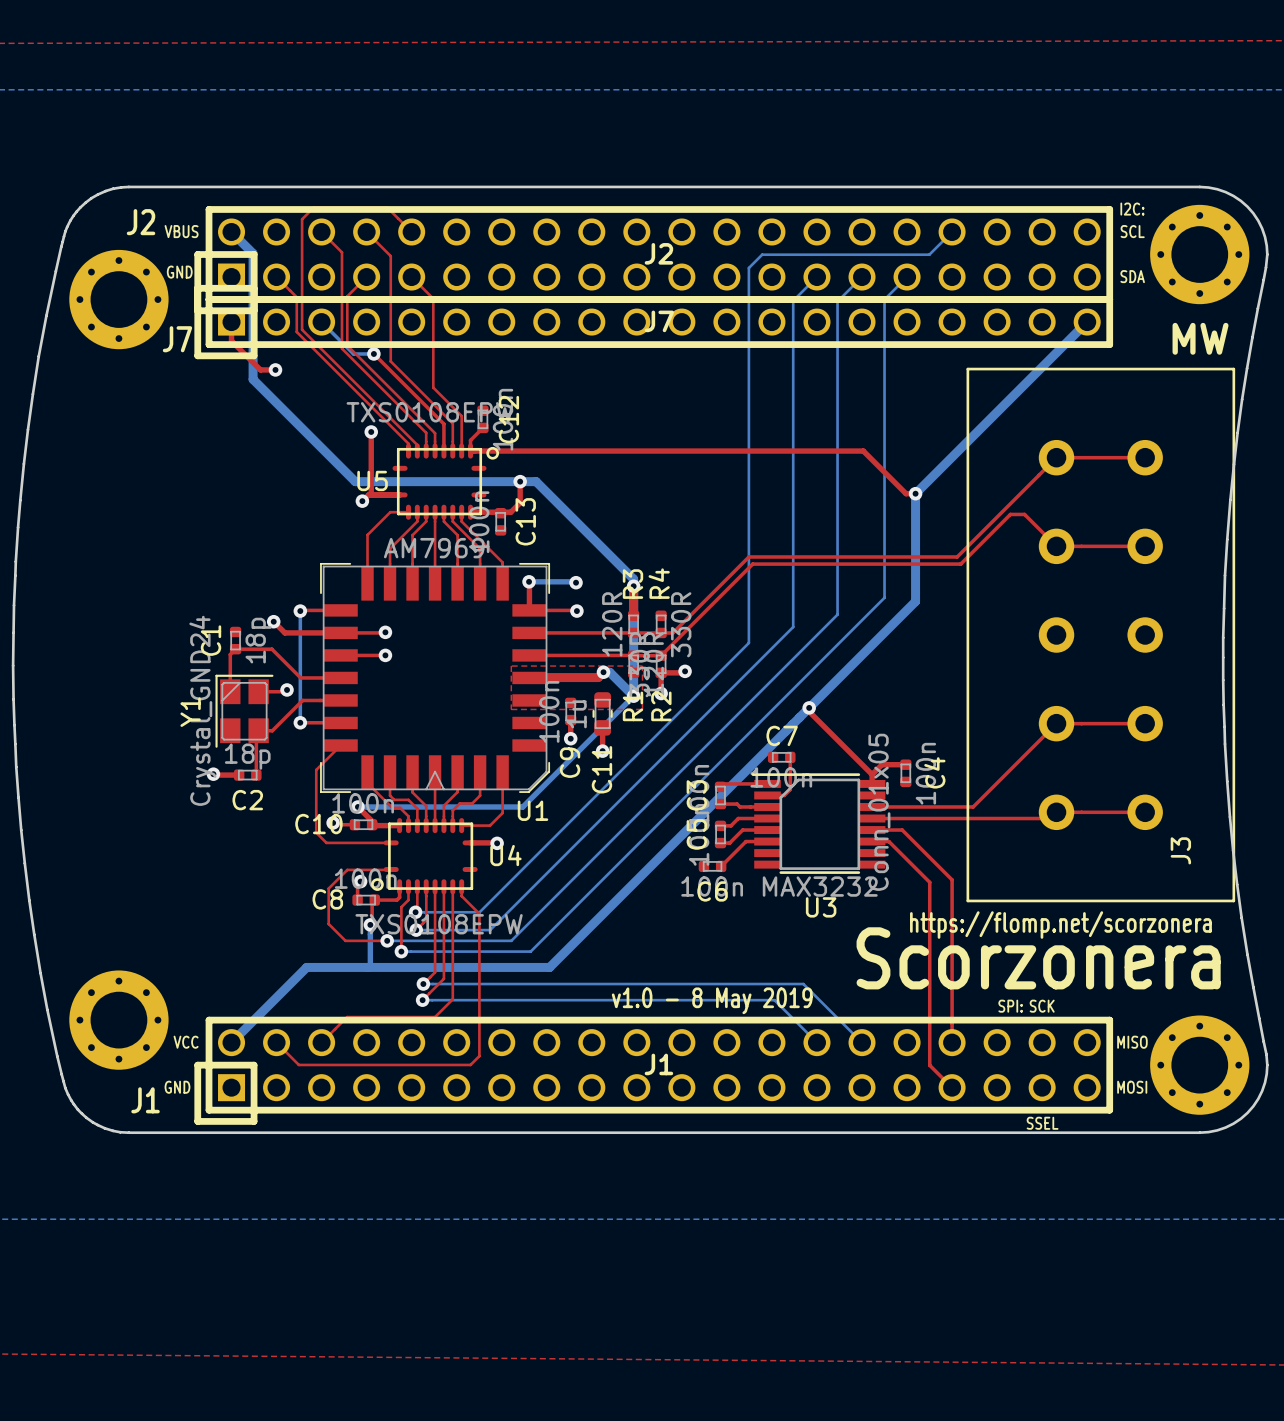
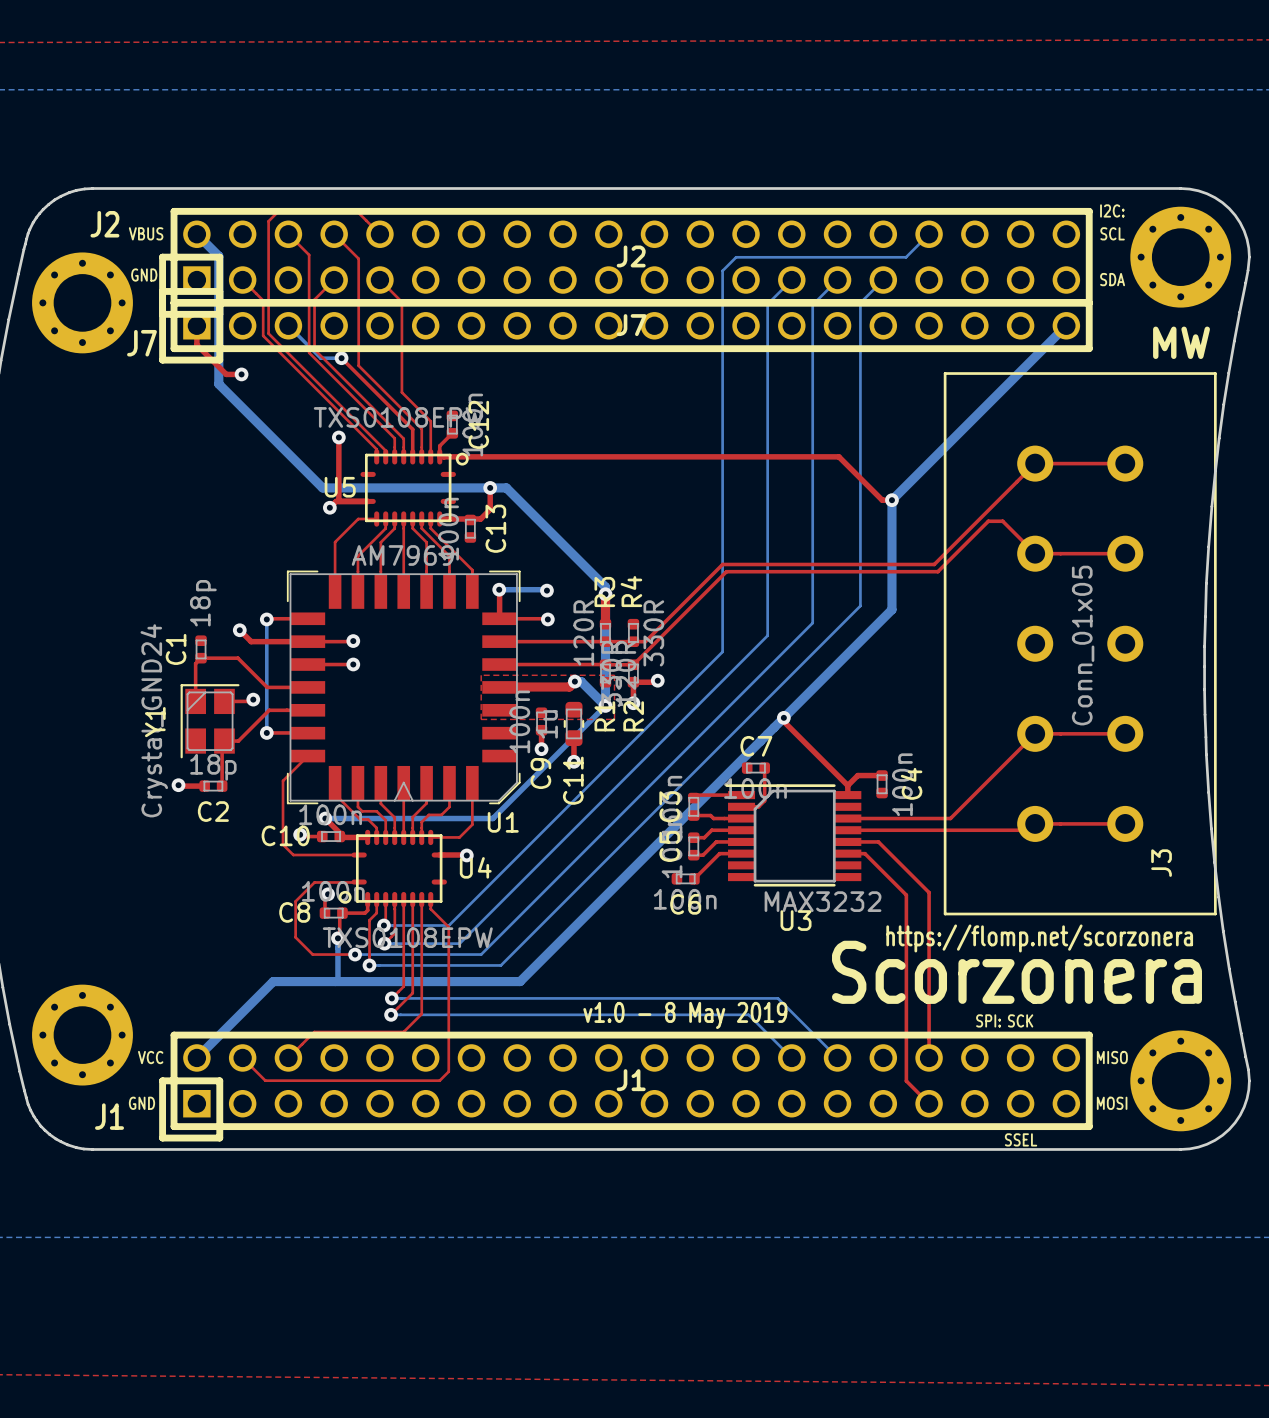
C1 value position: 18p (258, 640) -> 18p (203, 603)
Y1 value position: Crystal_GND24 (202, 710) -> Crystal_GND24 (154, 720)
J3 value position: Conn_01x05 (879, 812) -> Conn_01x05 (1083, 645)
U3 value position: MAX3232 (820, 886) -> MAX3232 (823, 901)

